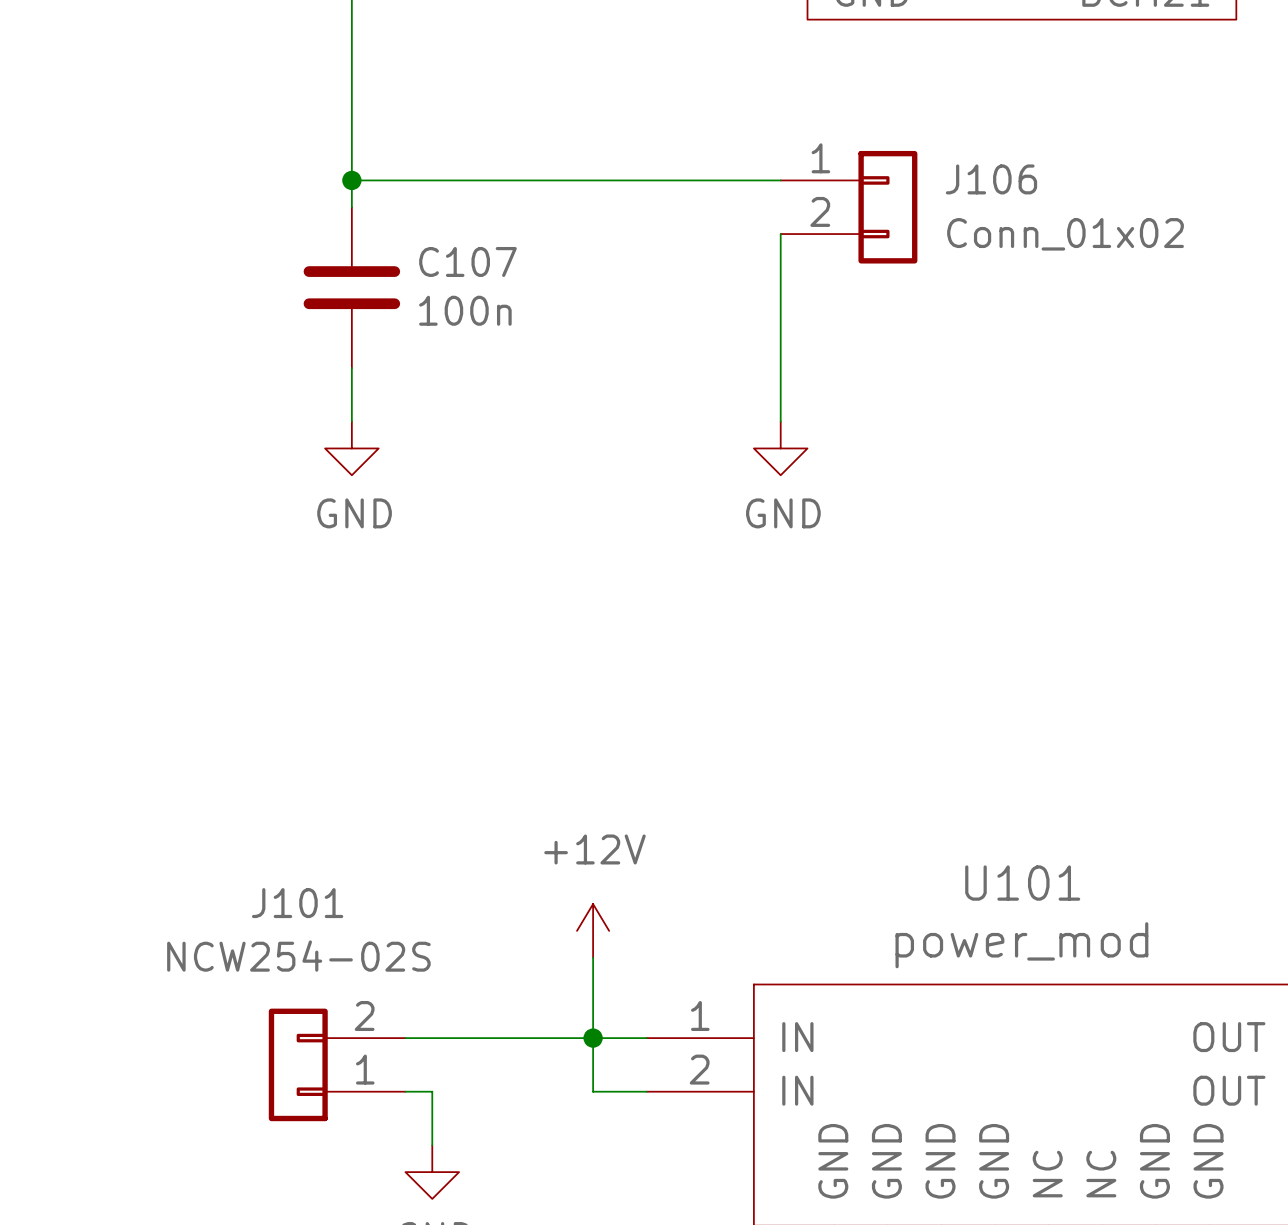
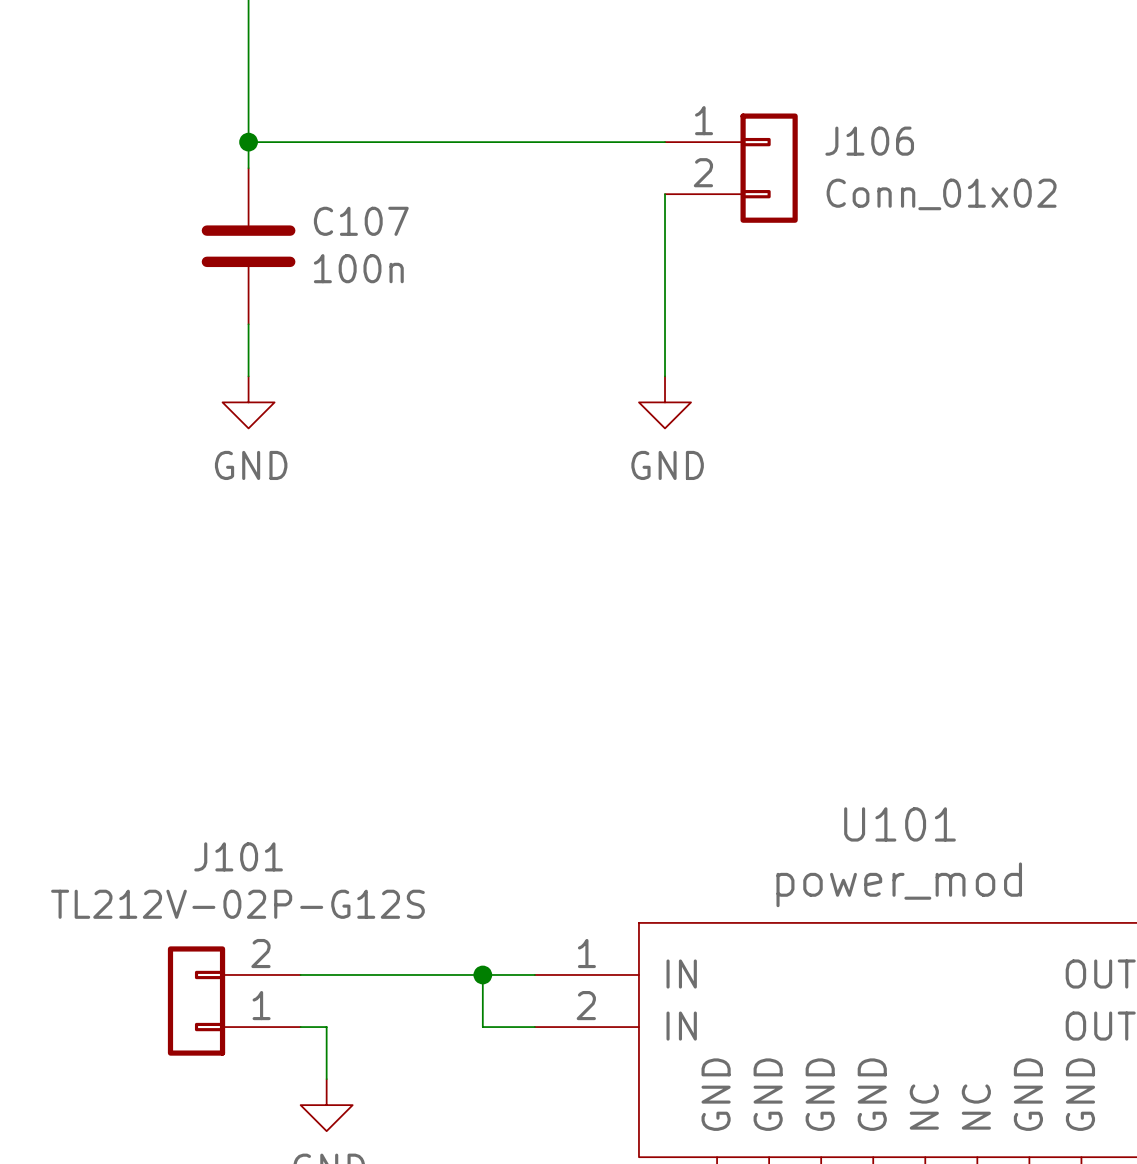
J101 name position: J101 (297, 903) -> J101 (238, 856)
power symbol: +12V (593, 930) -> none
J101 value: NCW254-02S (298, 956) -> TL212V-02P-G12S (237, 904)
wire: (593, 957) (593, 1038) -> none

